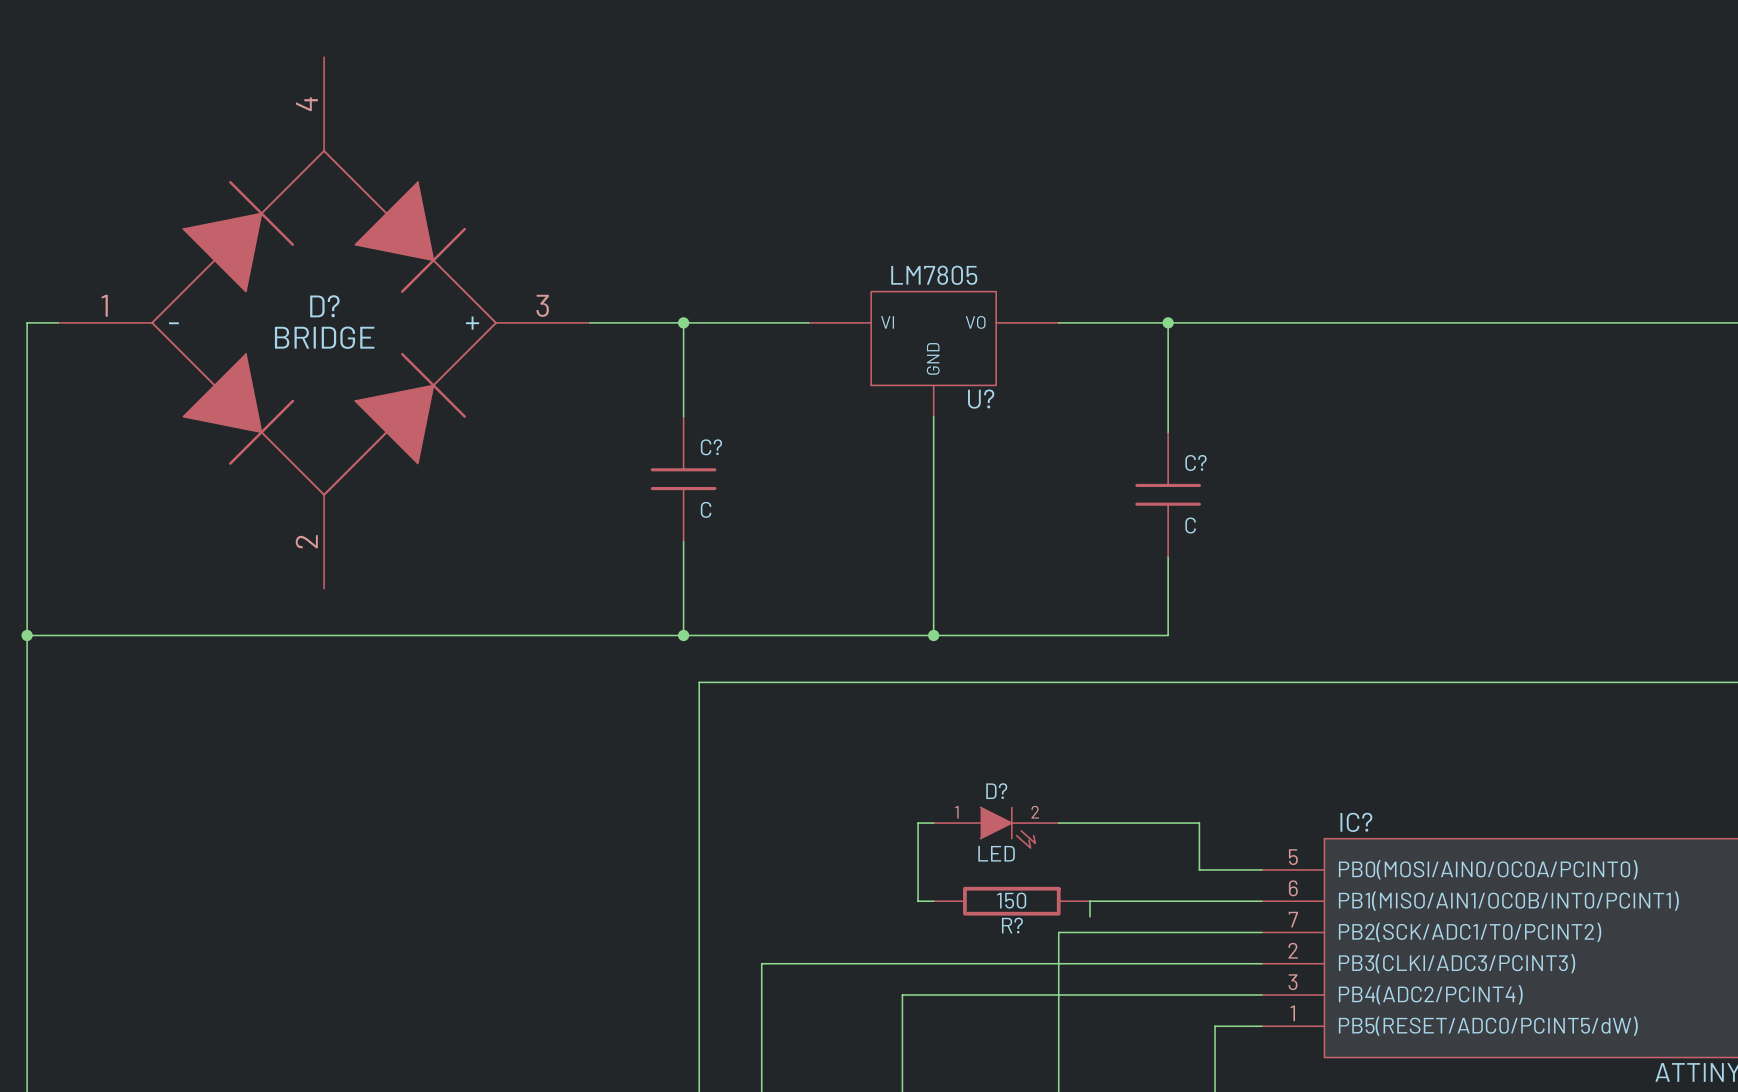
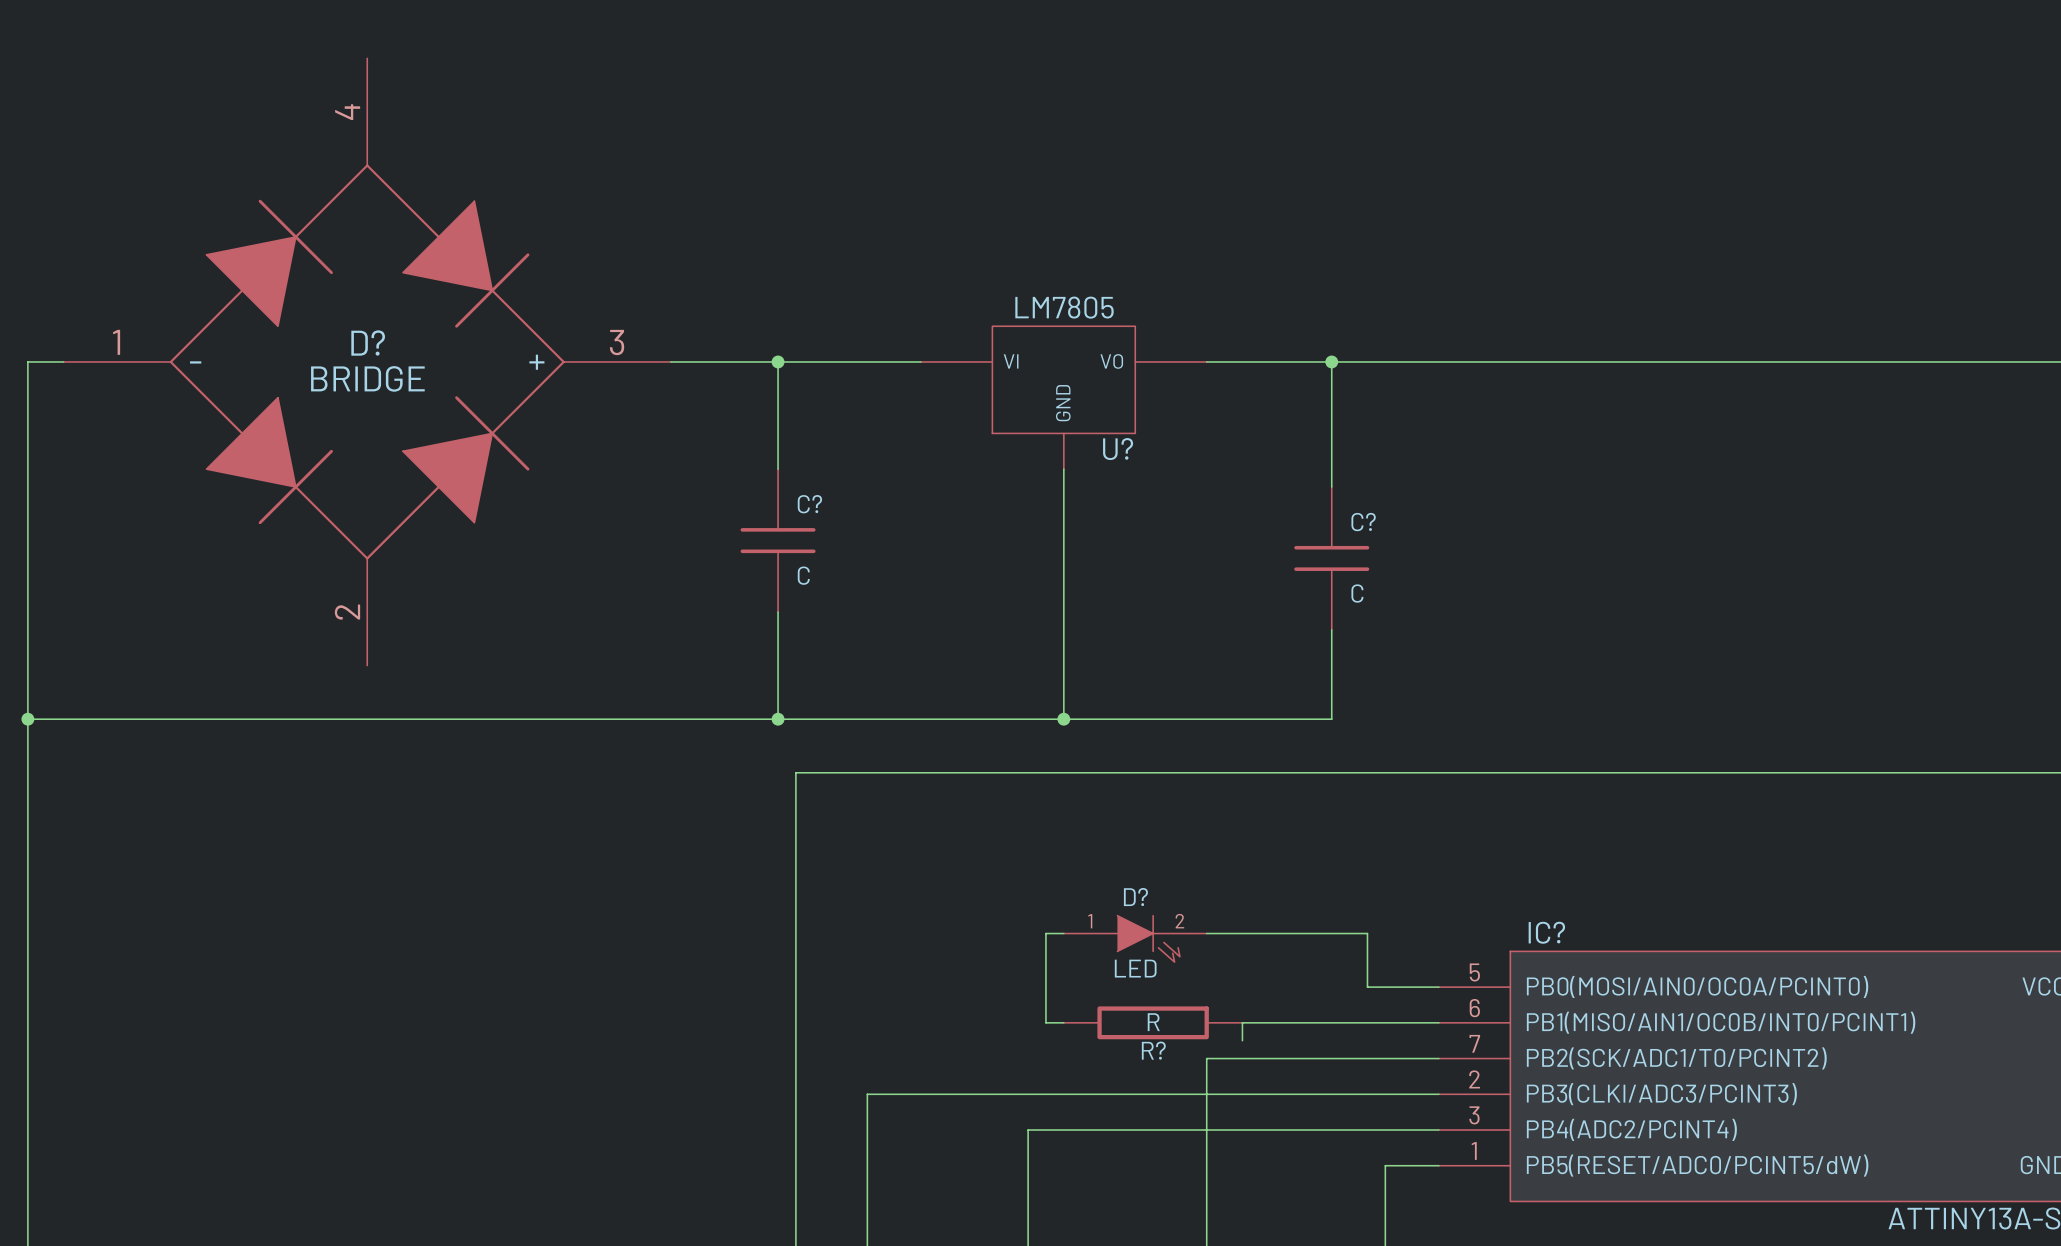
R? value: 150 (1011, 900) -> R (1153, 1022)

